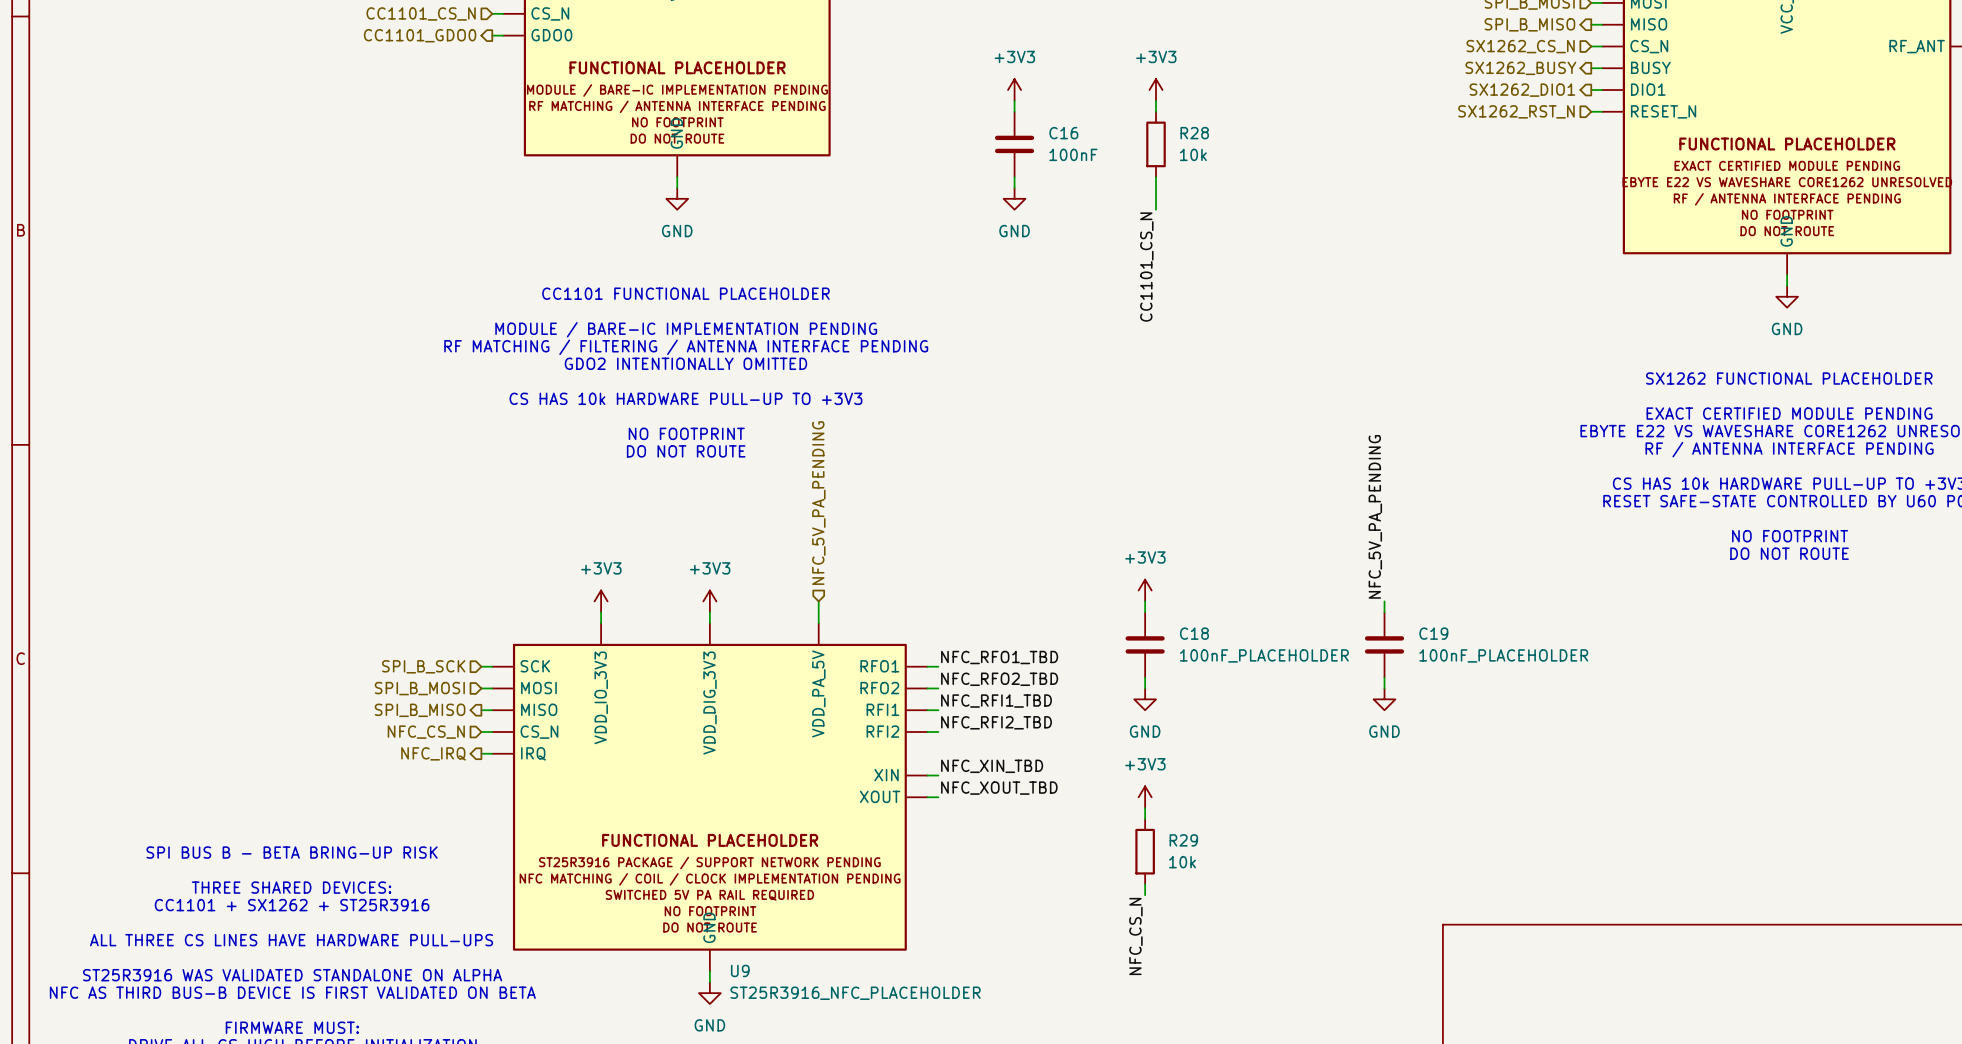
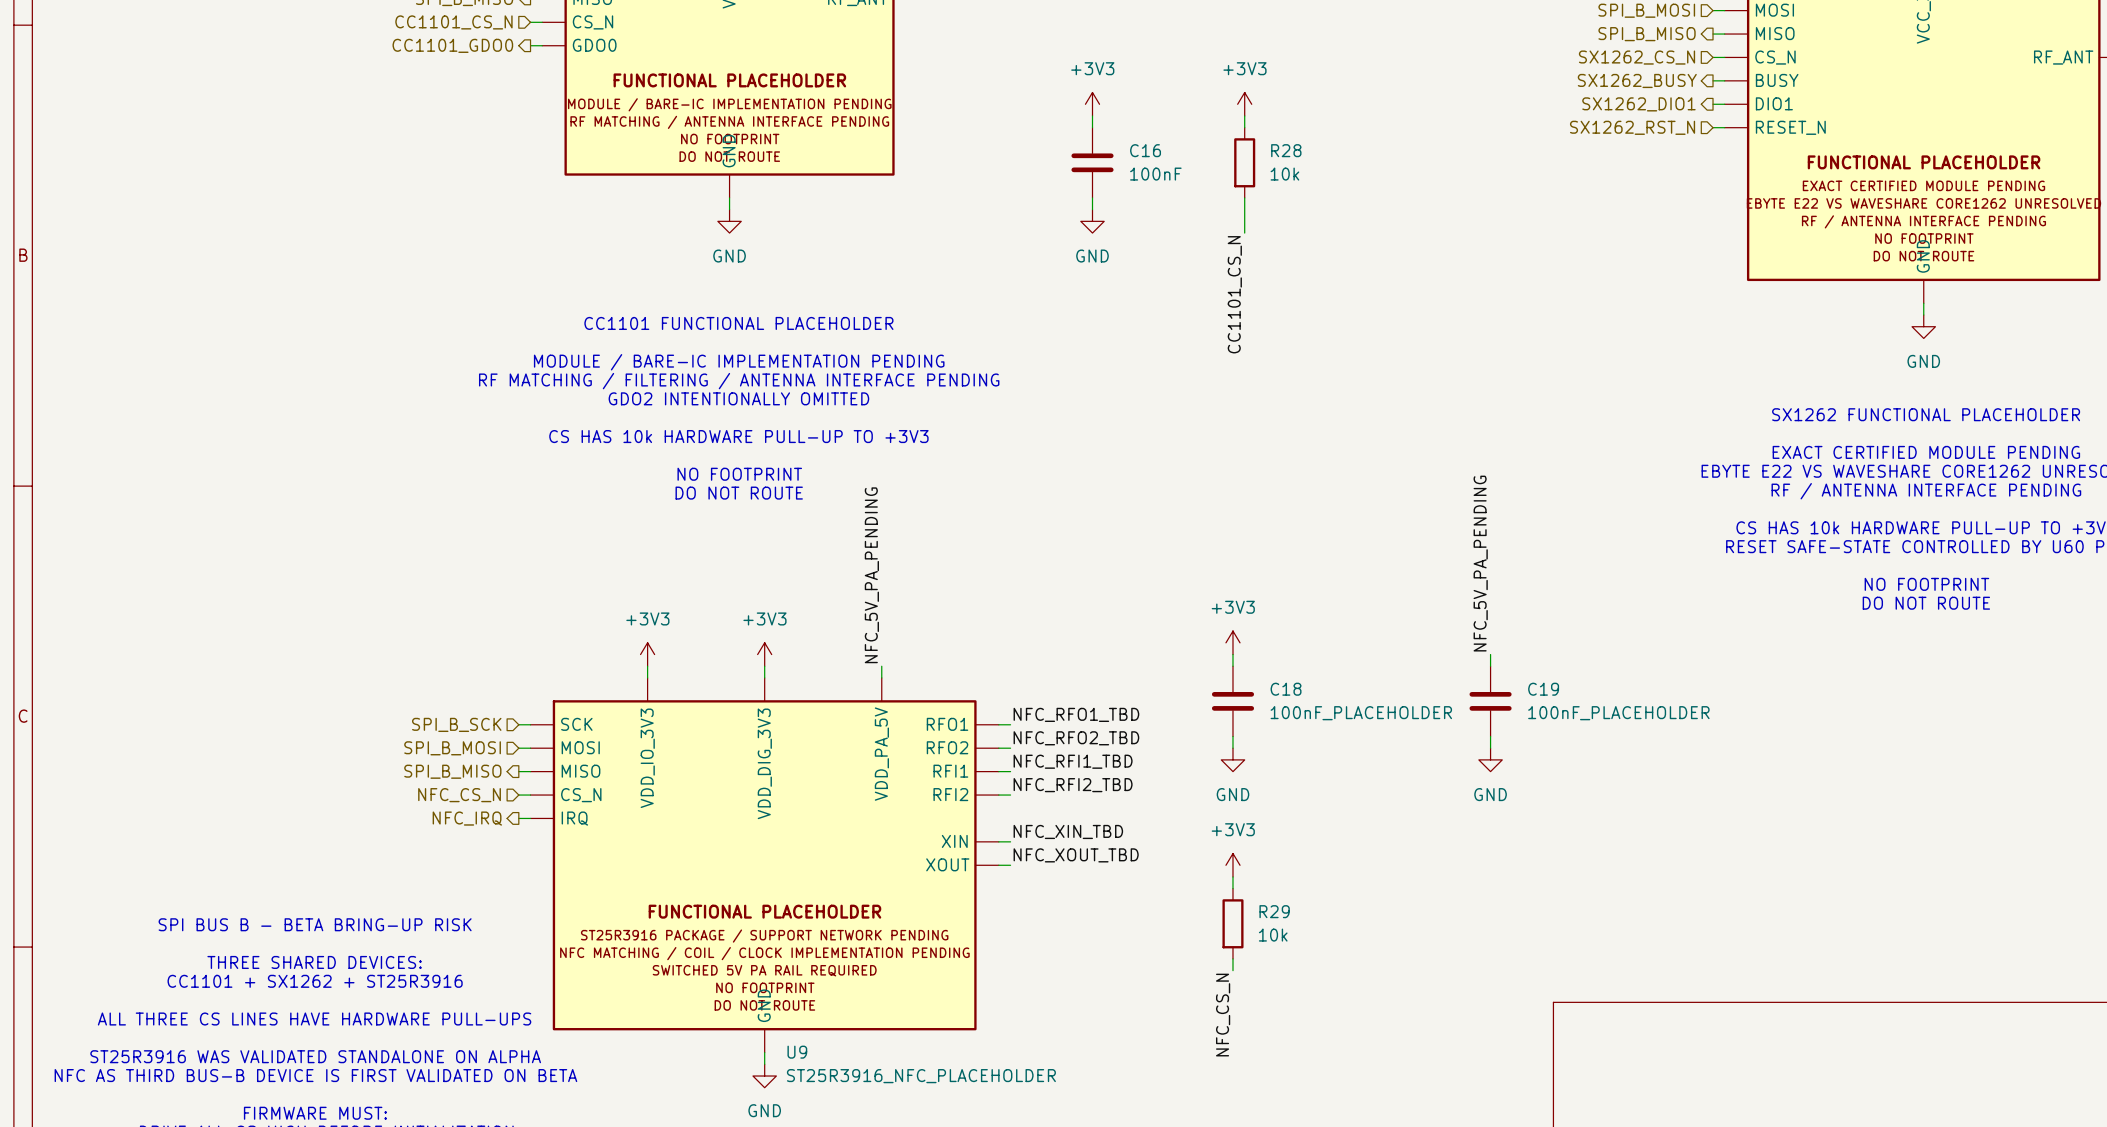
hierarchical label: NFC_5V_PA_PENDING (818, 503) -> none
label: none -> NFC_5V_PA_PENDING (871, 575)
wire: (818, 601) (818, 612) -> none

